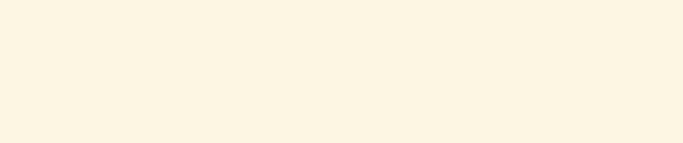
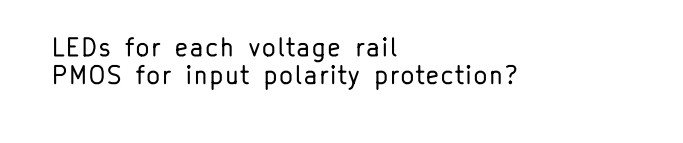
text: none -> LEDs for each voltage rail (225, 49)
text: none -> PMOS for input polarity protection? (285, 77)

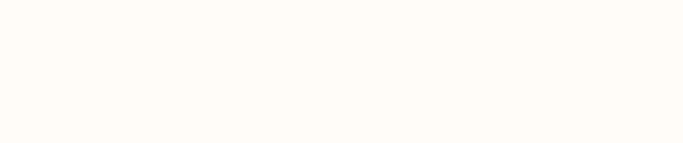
text: LEDs for each voltage rail (225, 49) -> none
text: PMOS for input polarity protection? (285, 77) -> none

